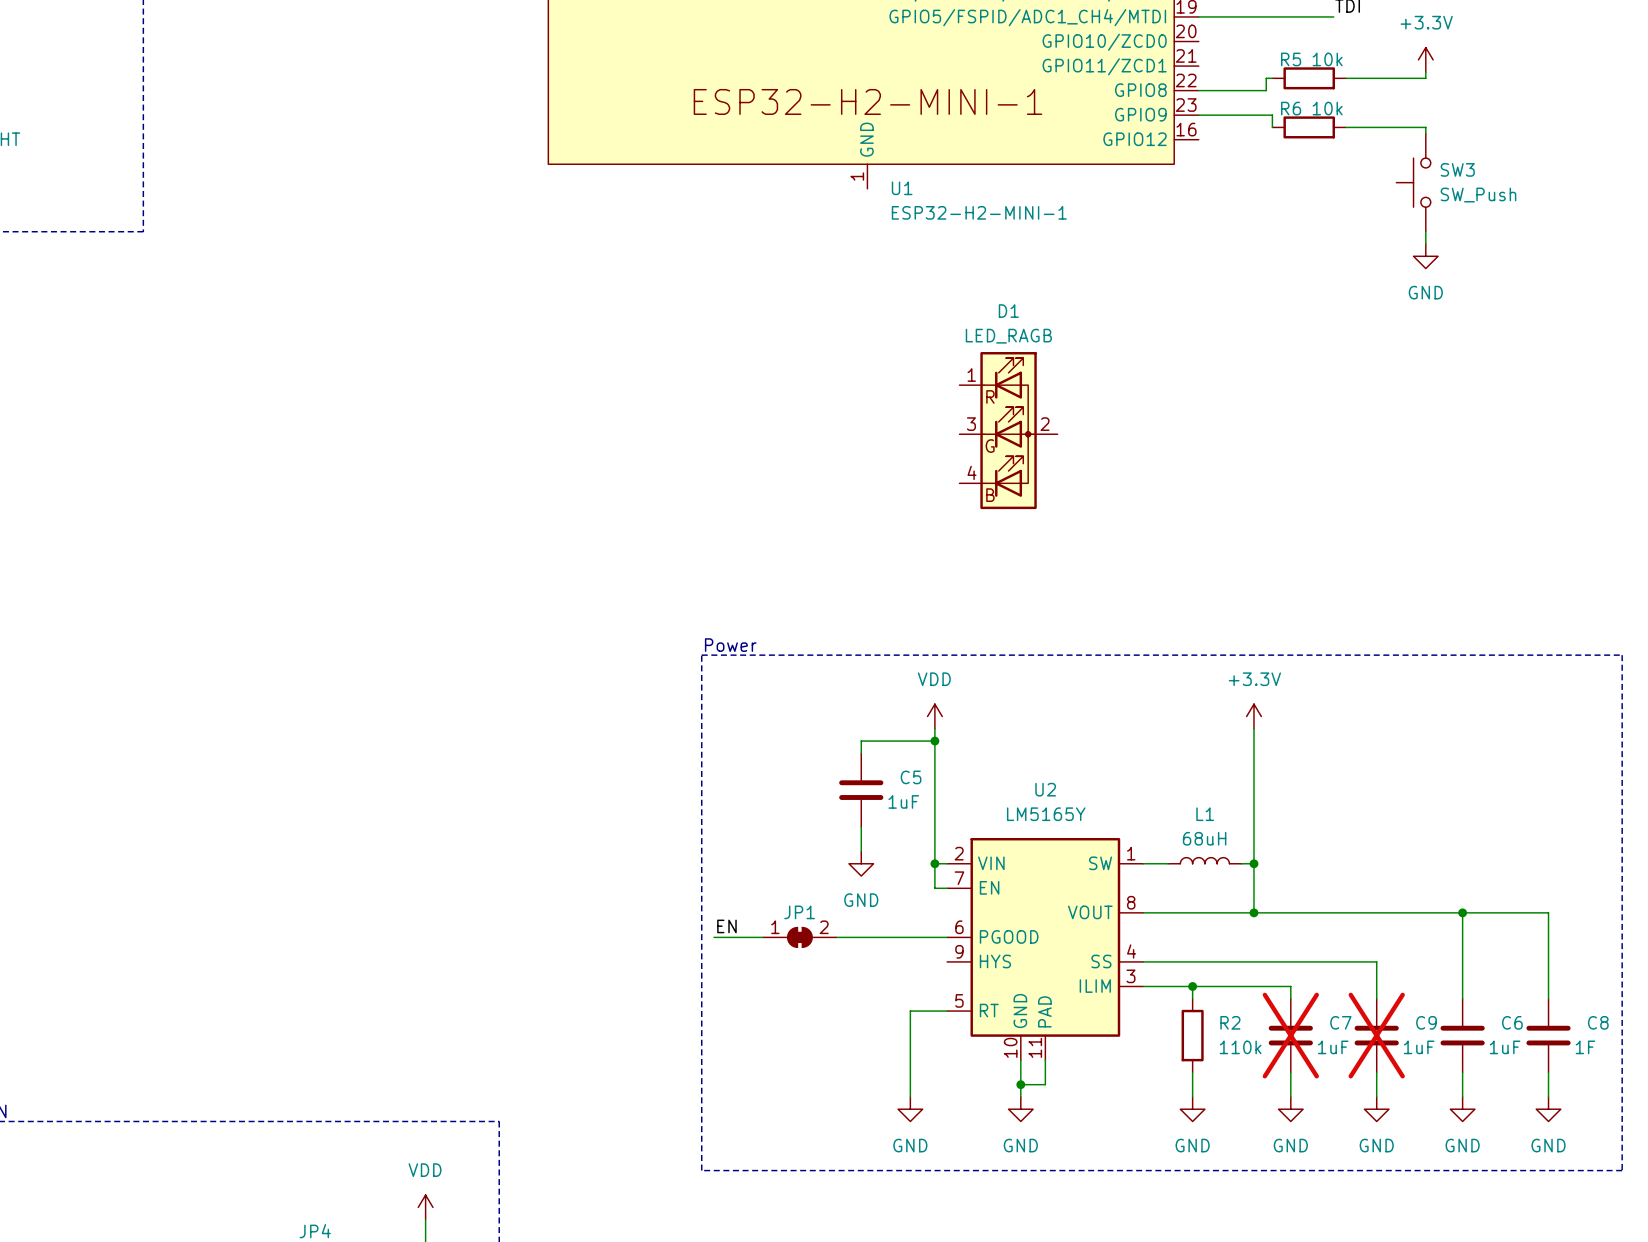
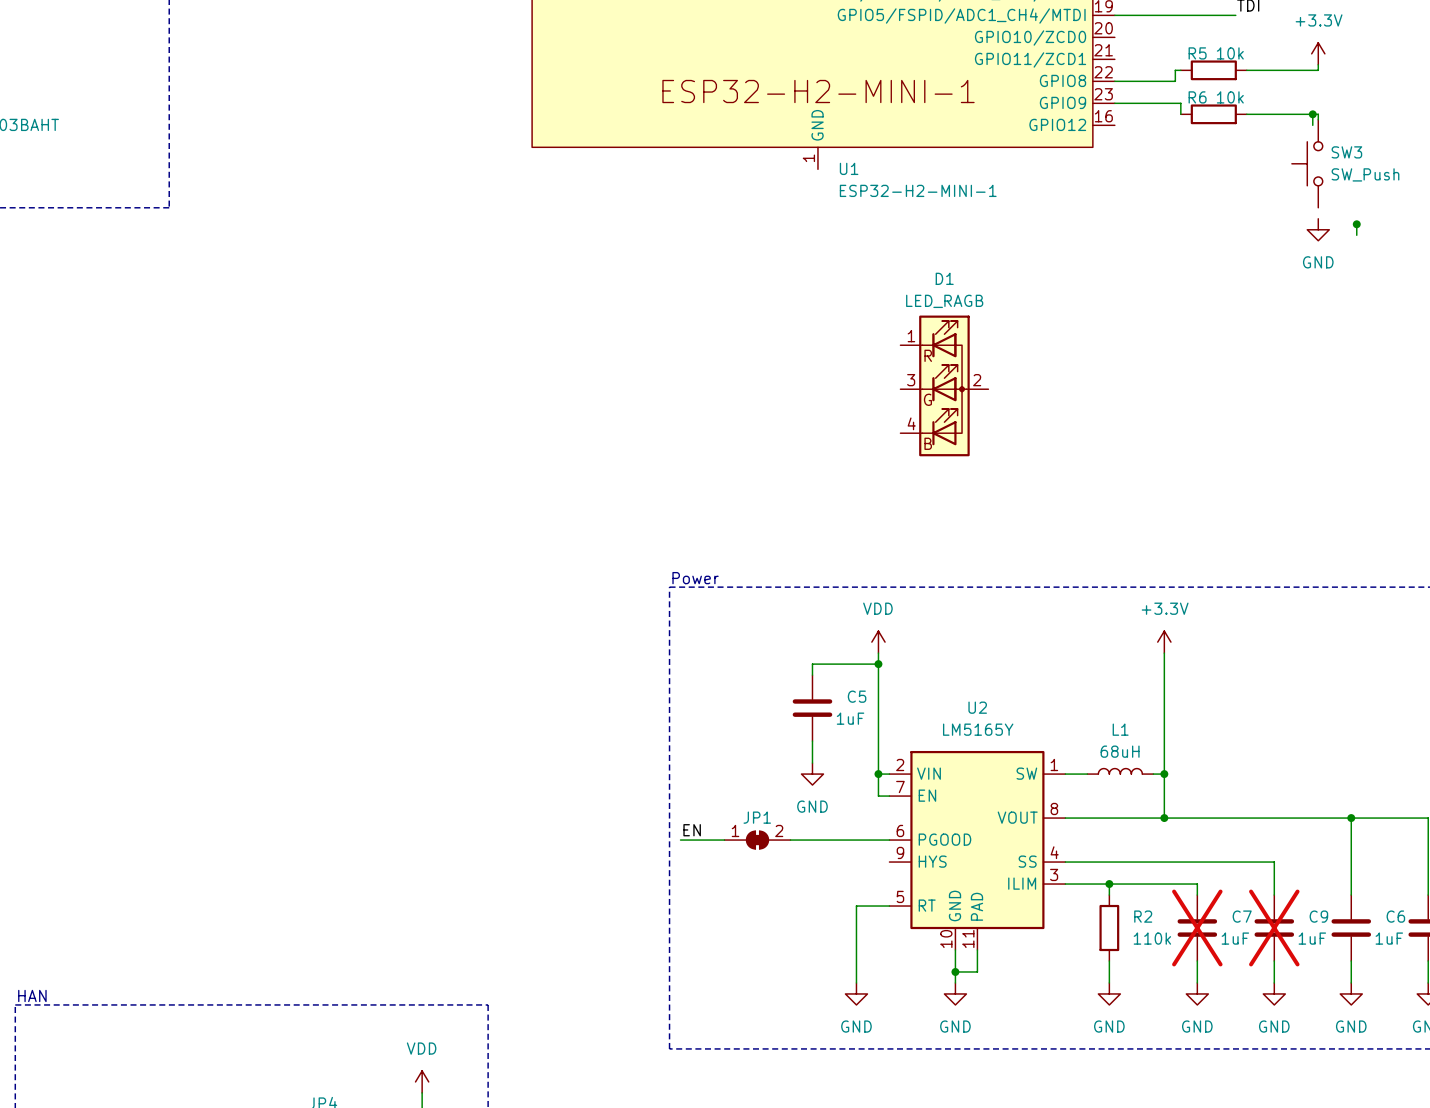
wire: none -> (1312, 114) (1312, 125)
junction: none -> (1312, 114)
wire: (1425, 231) (1425, 244) -> (1356, 224) (1356, 235)
junction: none -> (1356, 224)

